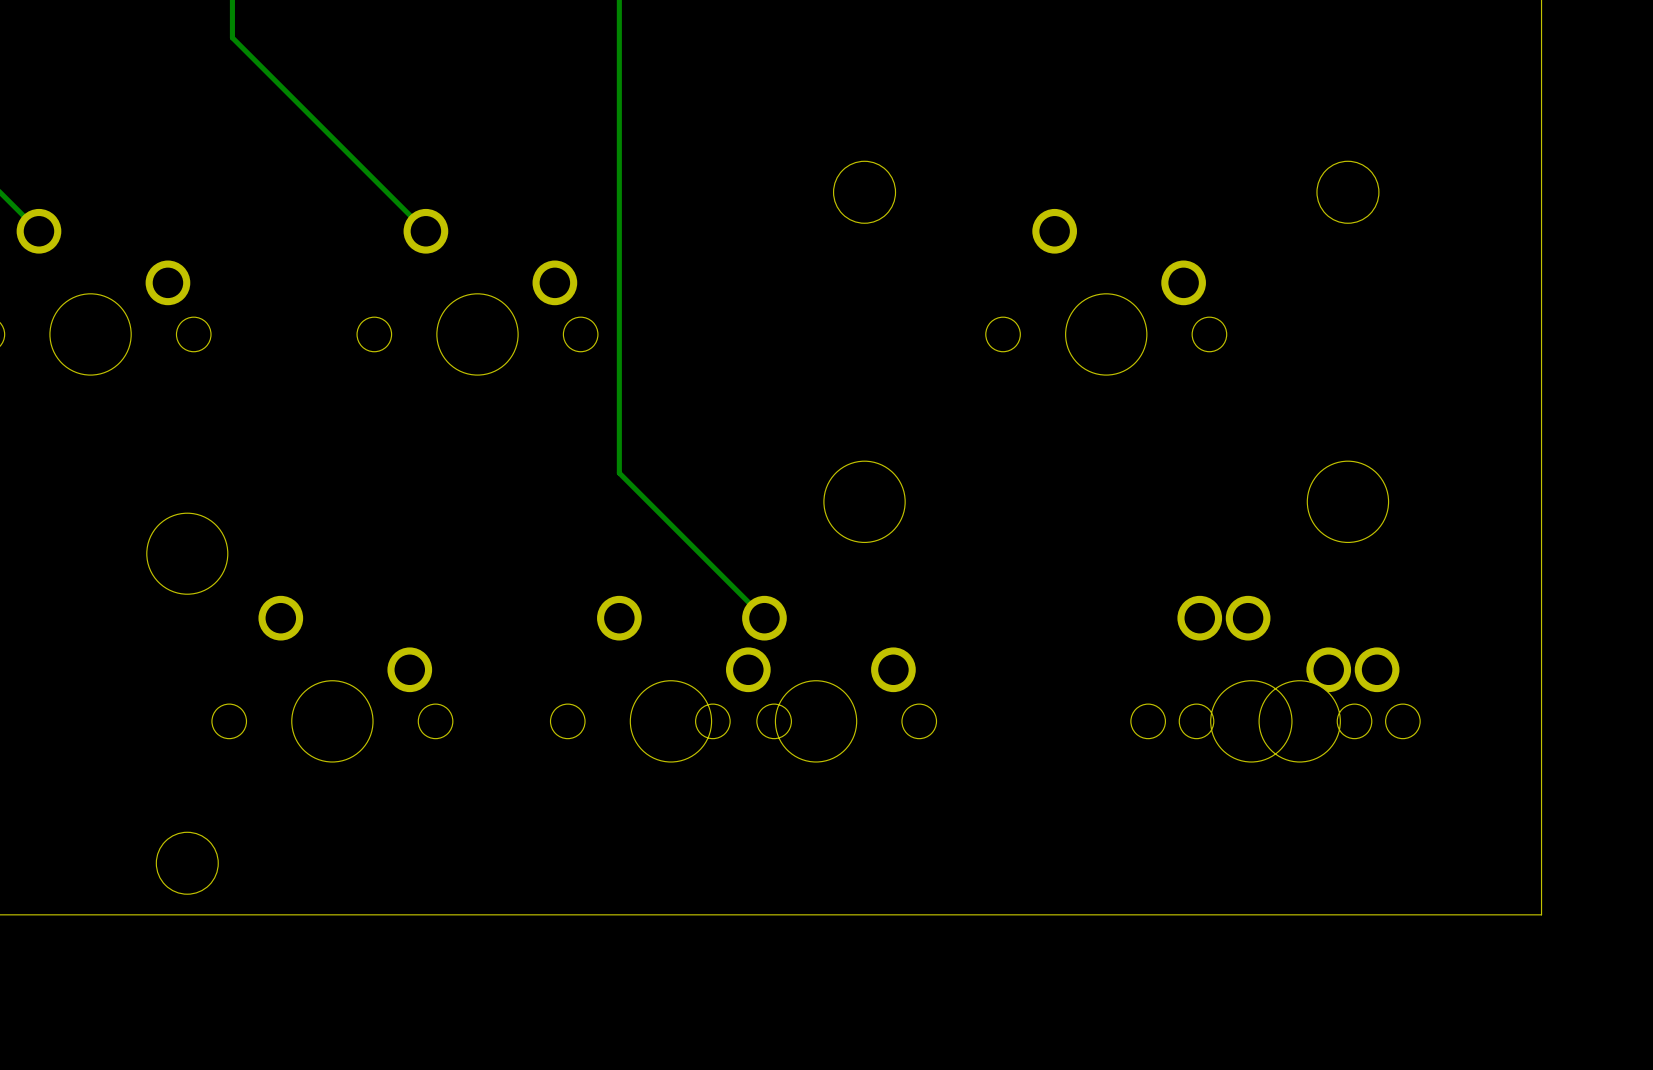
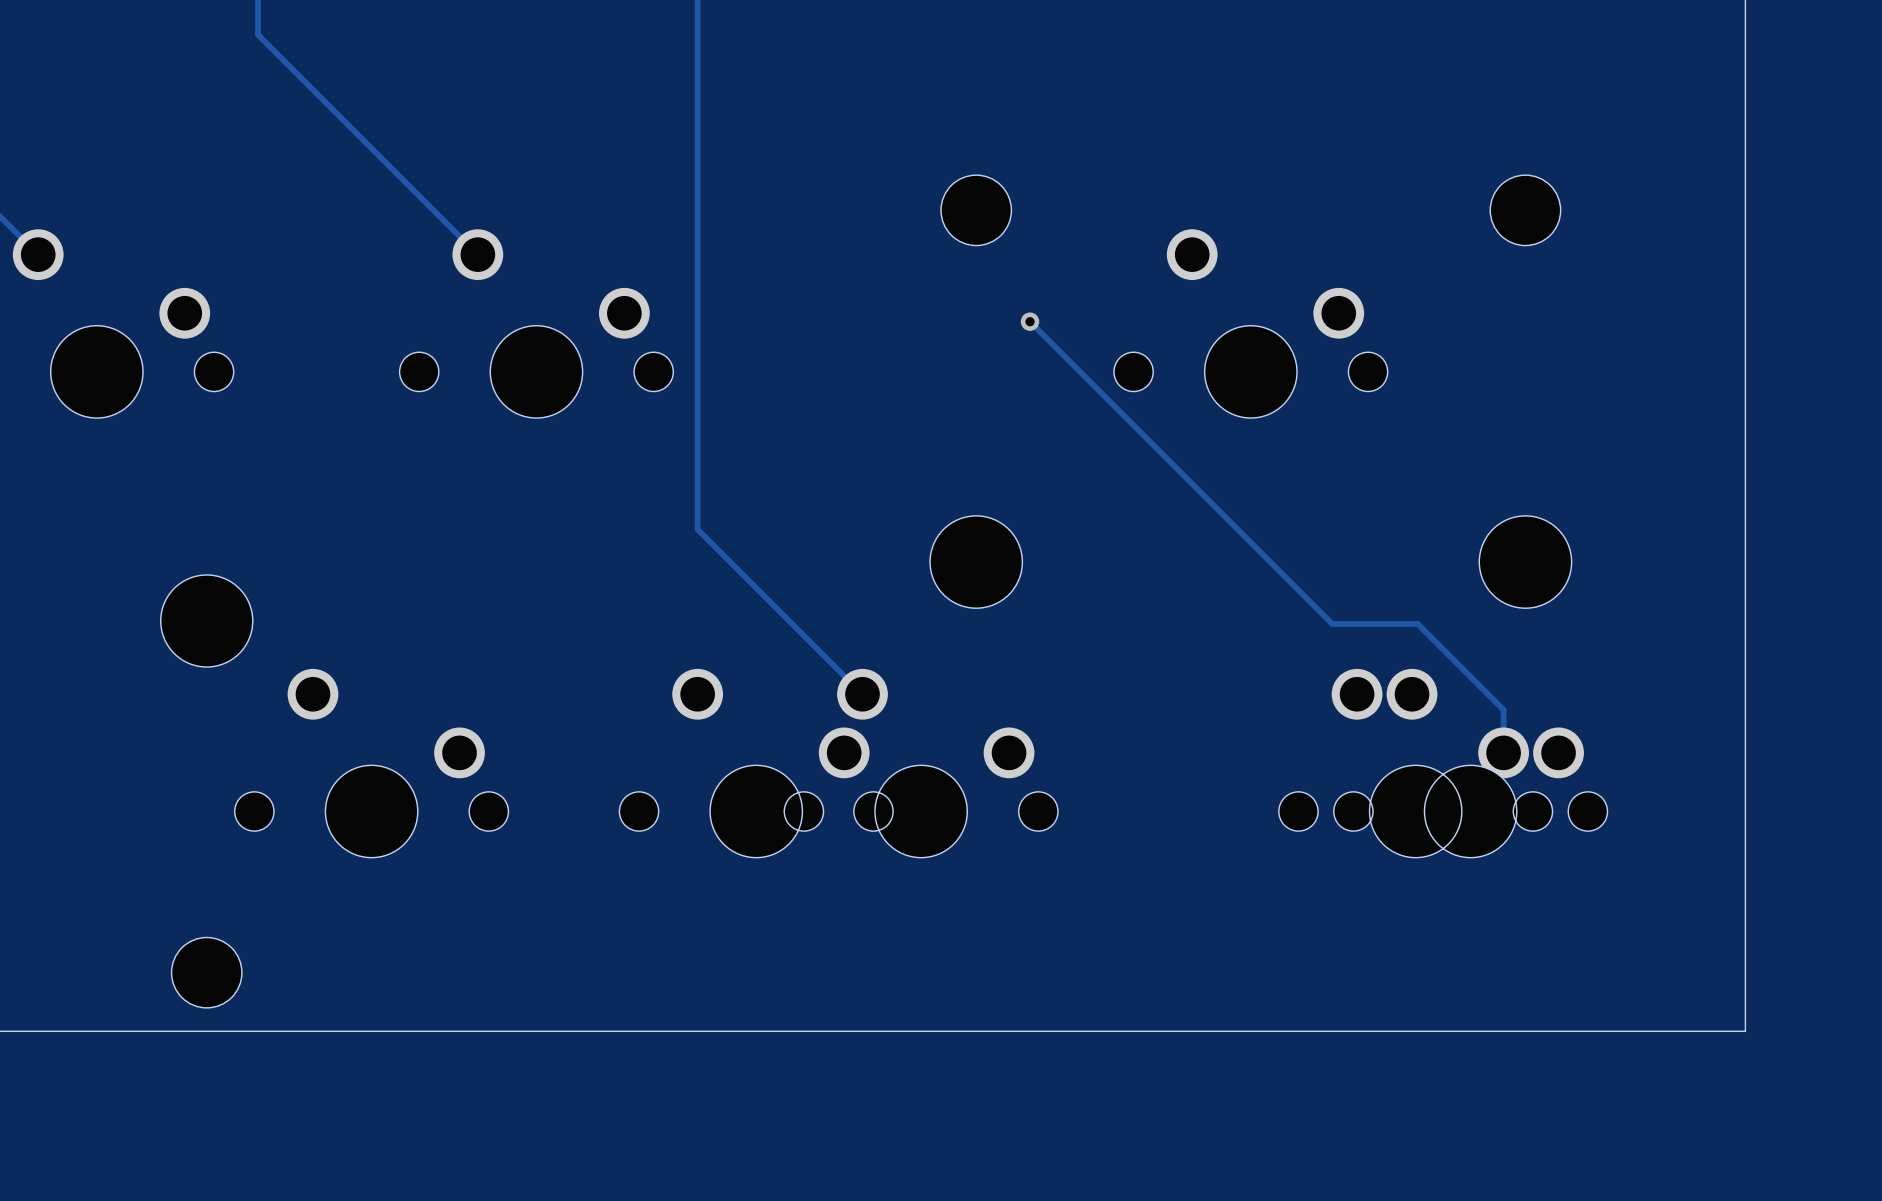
track: none -> (1030, 321) (1332, 624) (1417, 624) (1503, 709) (1503, 752)
via: none -> (1030, 321)

